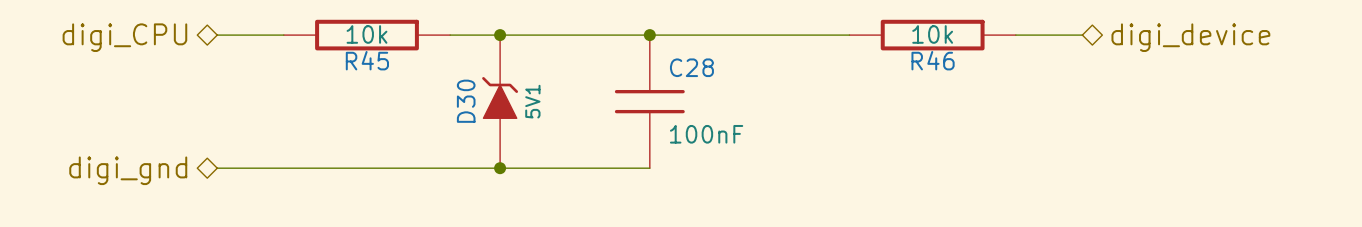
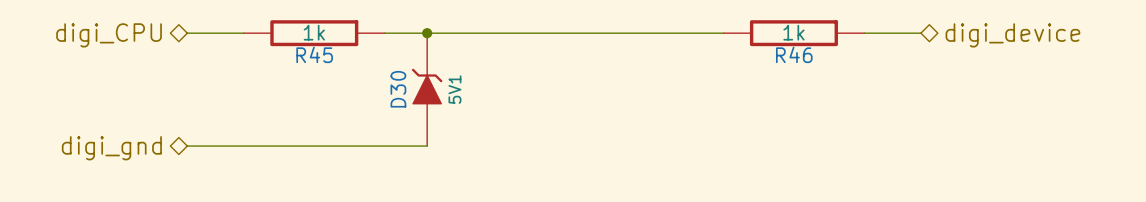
R45 value: 10k (366, 34) -> 1k (314, 32)
R46 value: 10k (932, 34) -> 1k (793, 32)
junction: (649, 35) -> none
C28: 100nF (649, 101) -> none
wire: (500, 168) (649, 168) -> none
junction: (500, 168) -> none

